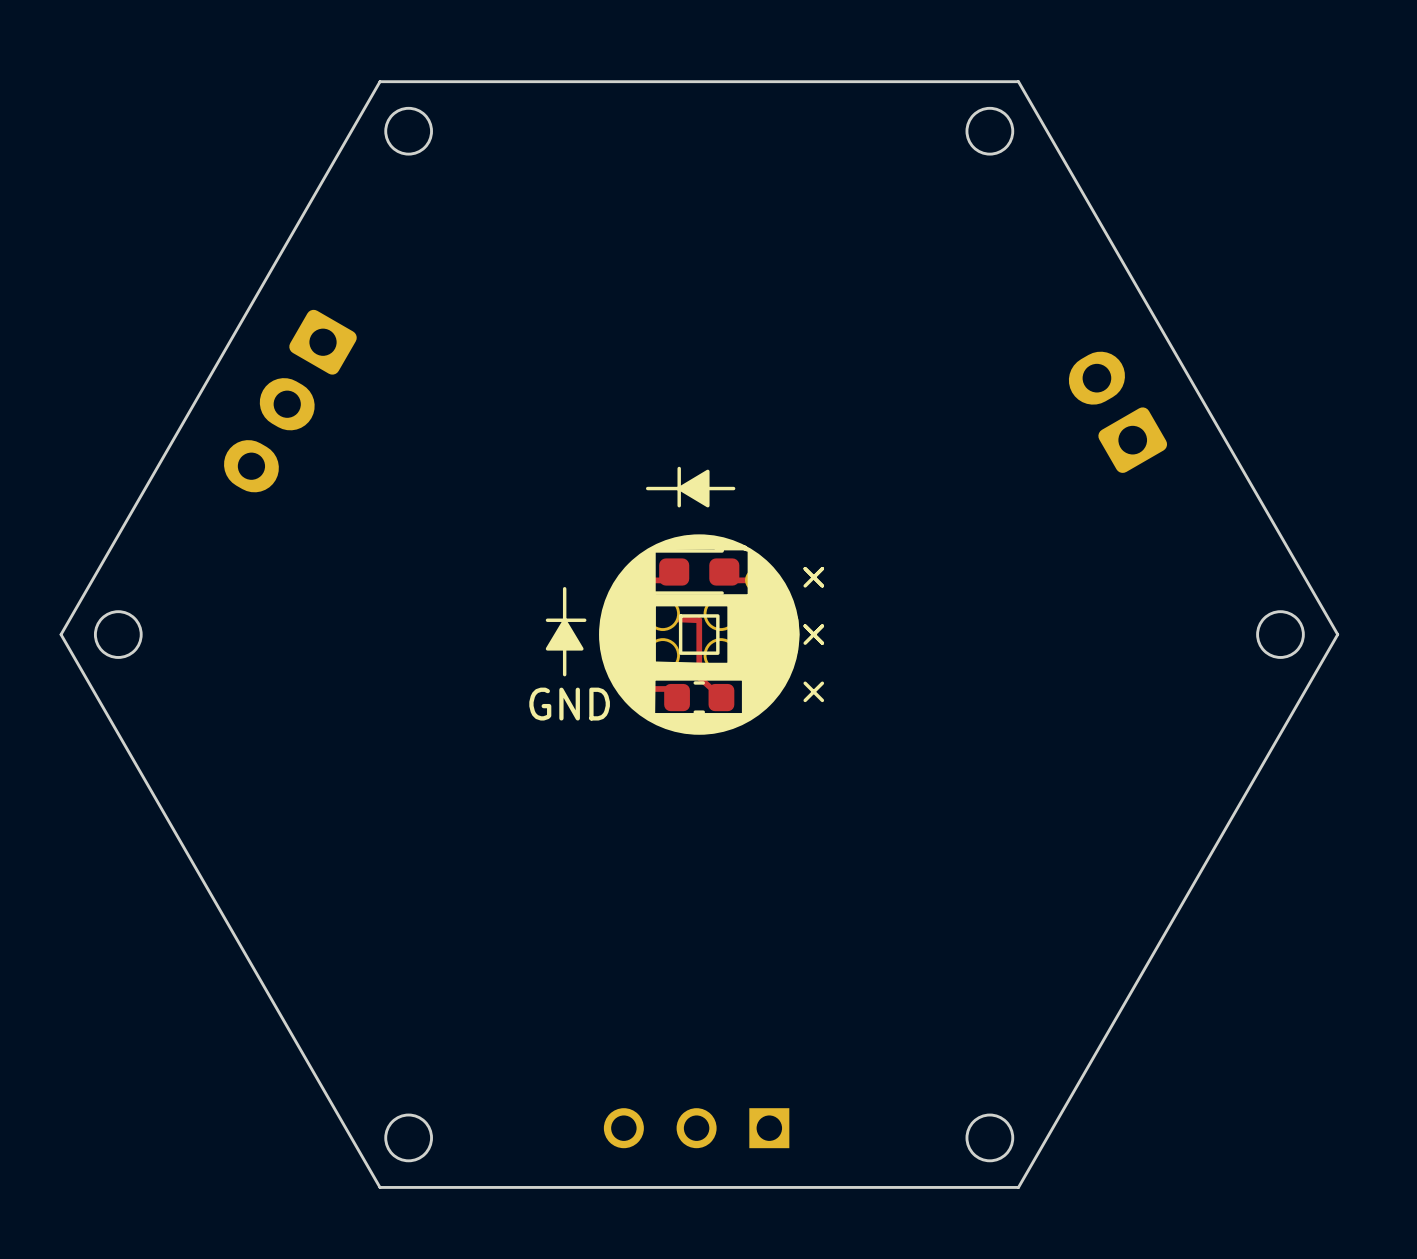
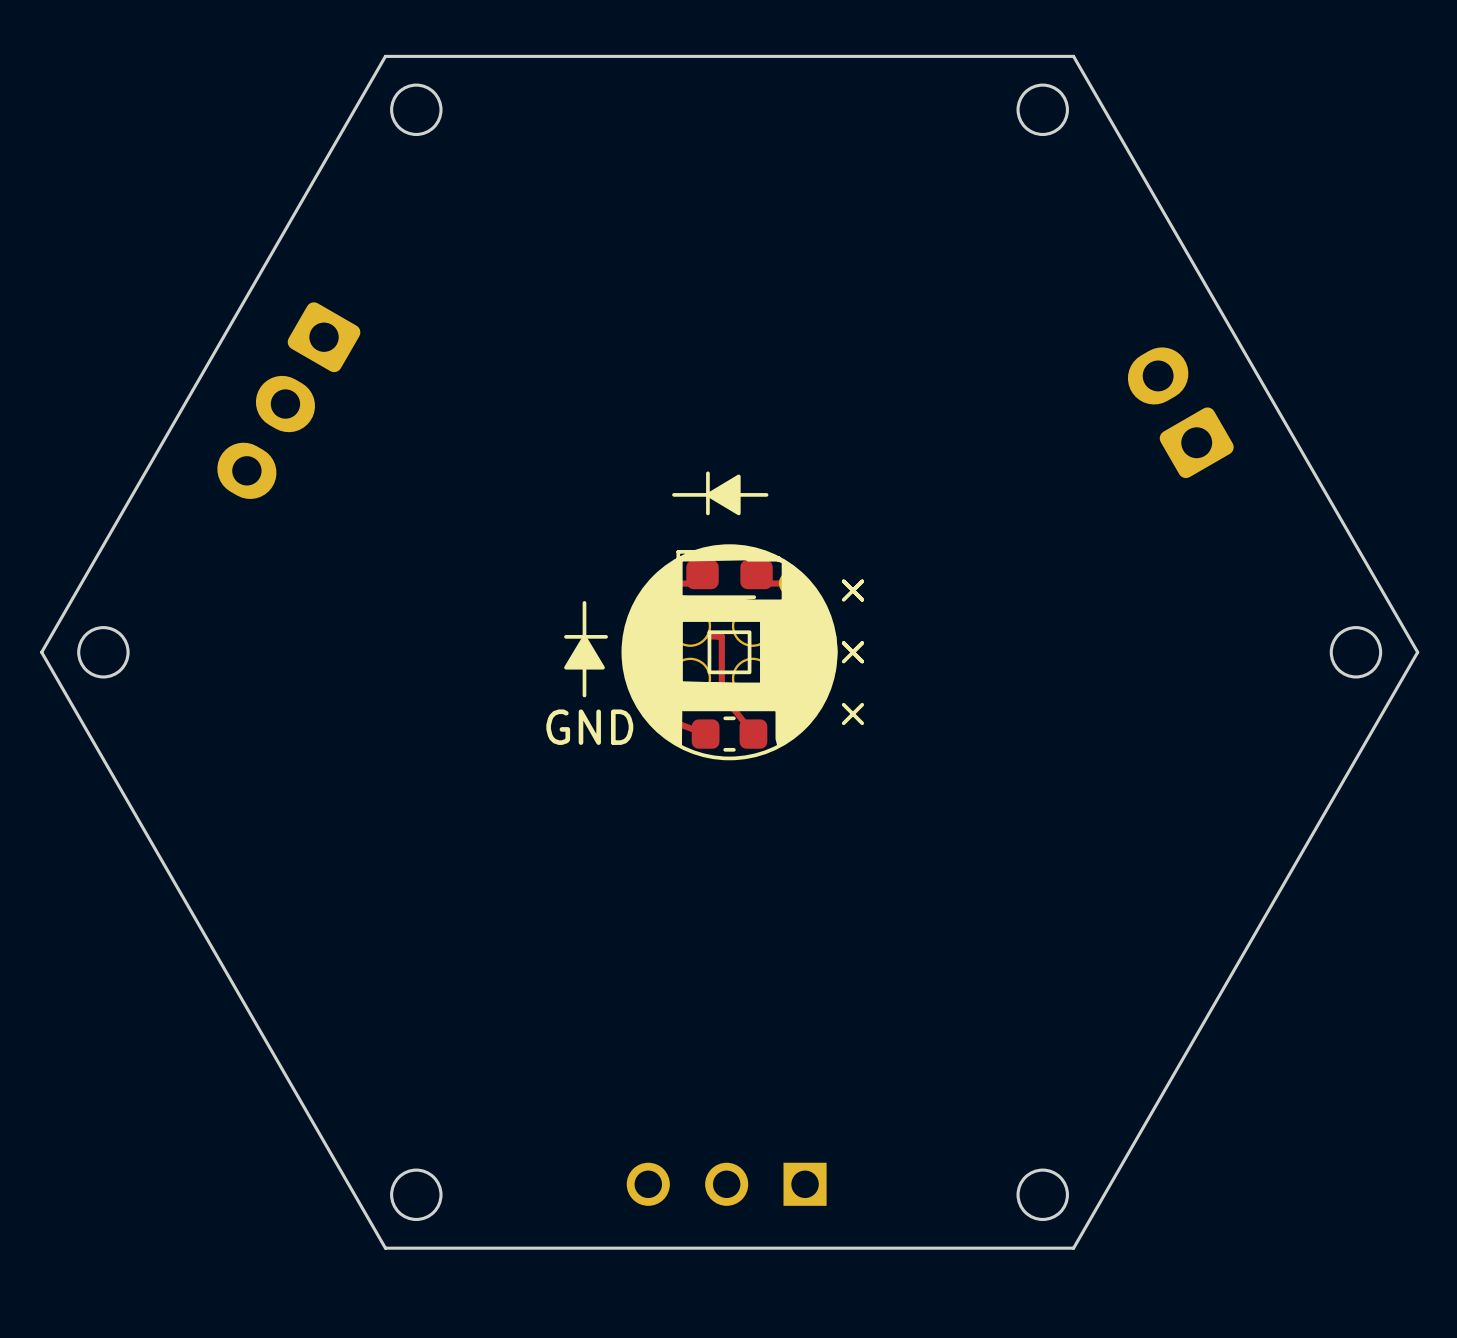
part footprint: [545, 466, 825, 735] -> [564, 471, 865, 761]

